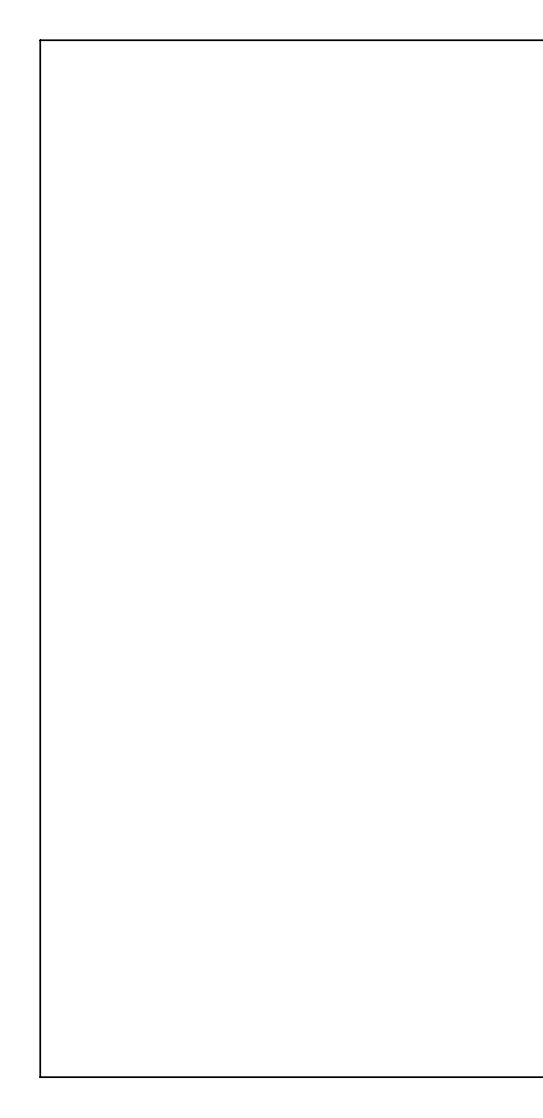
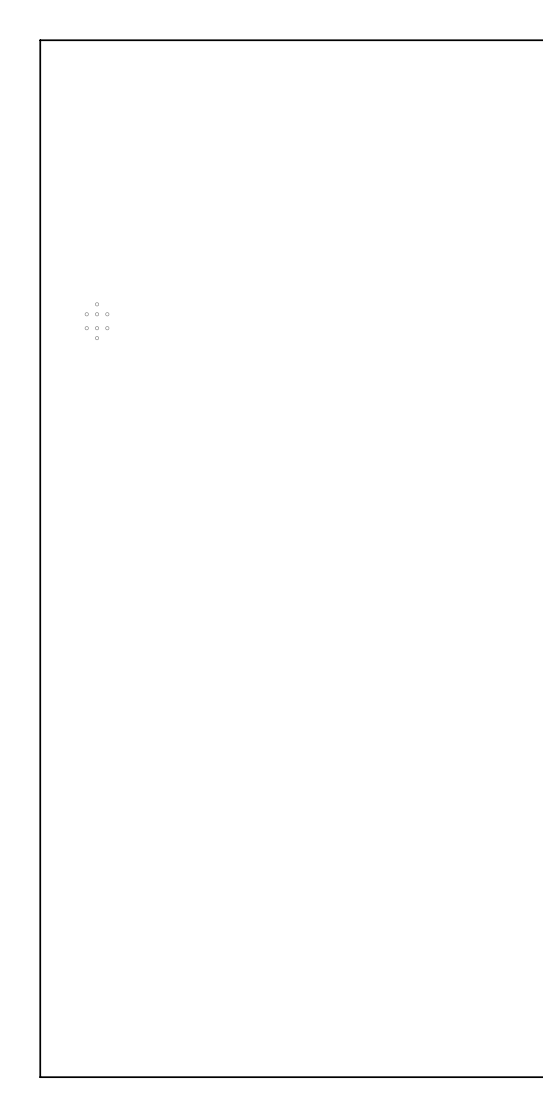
part: none -> (97, 321)

